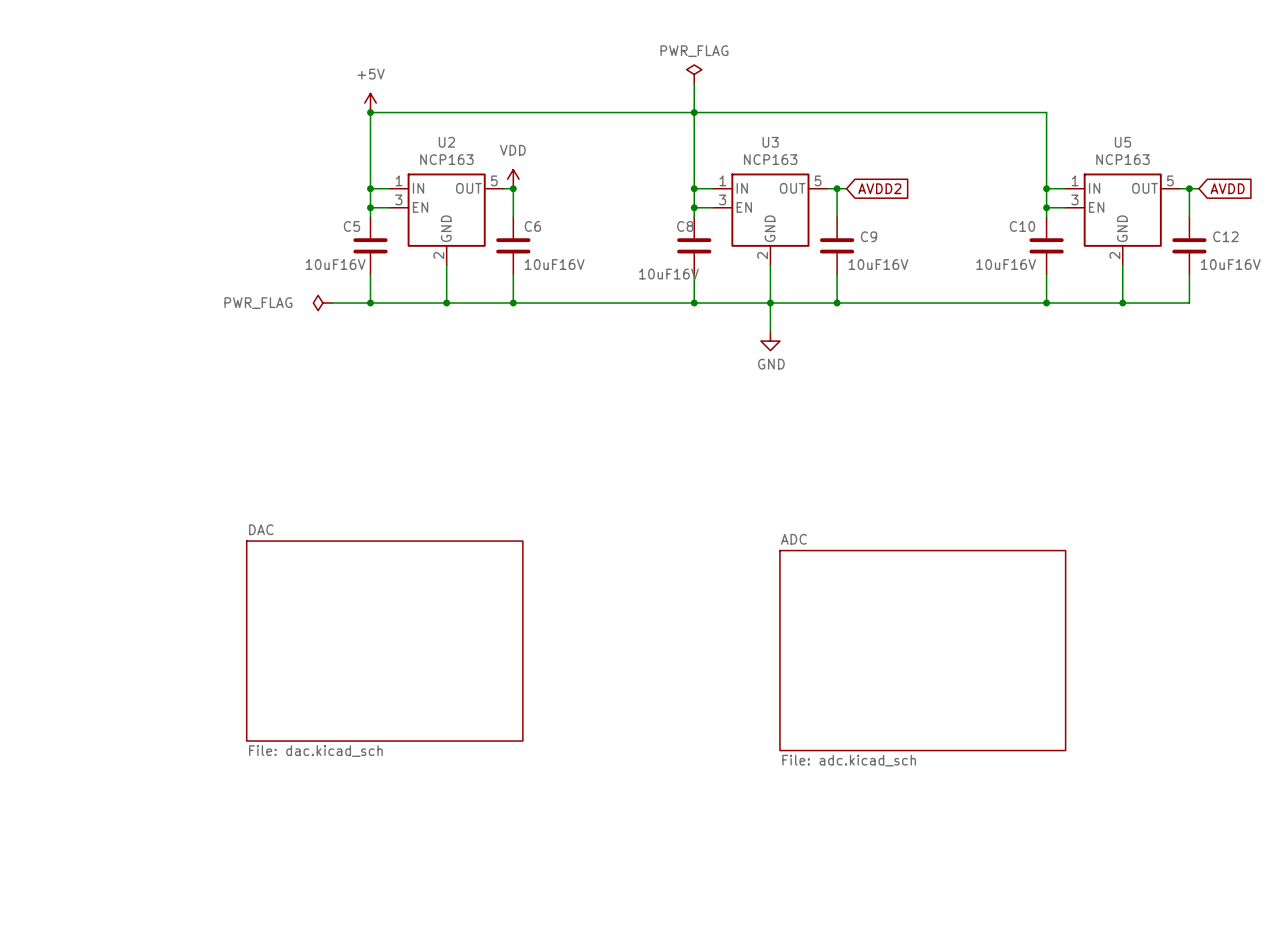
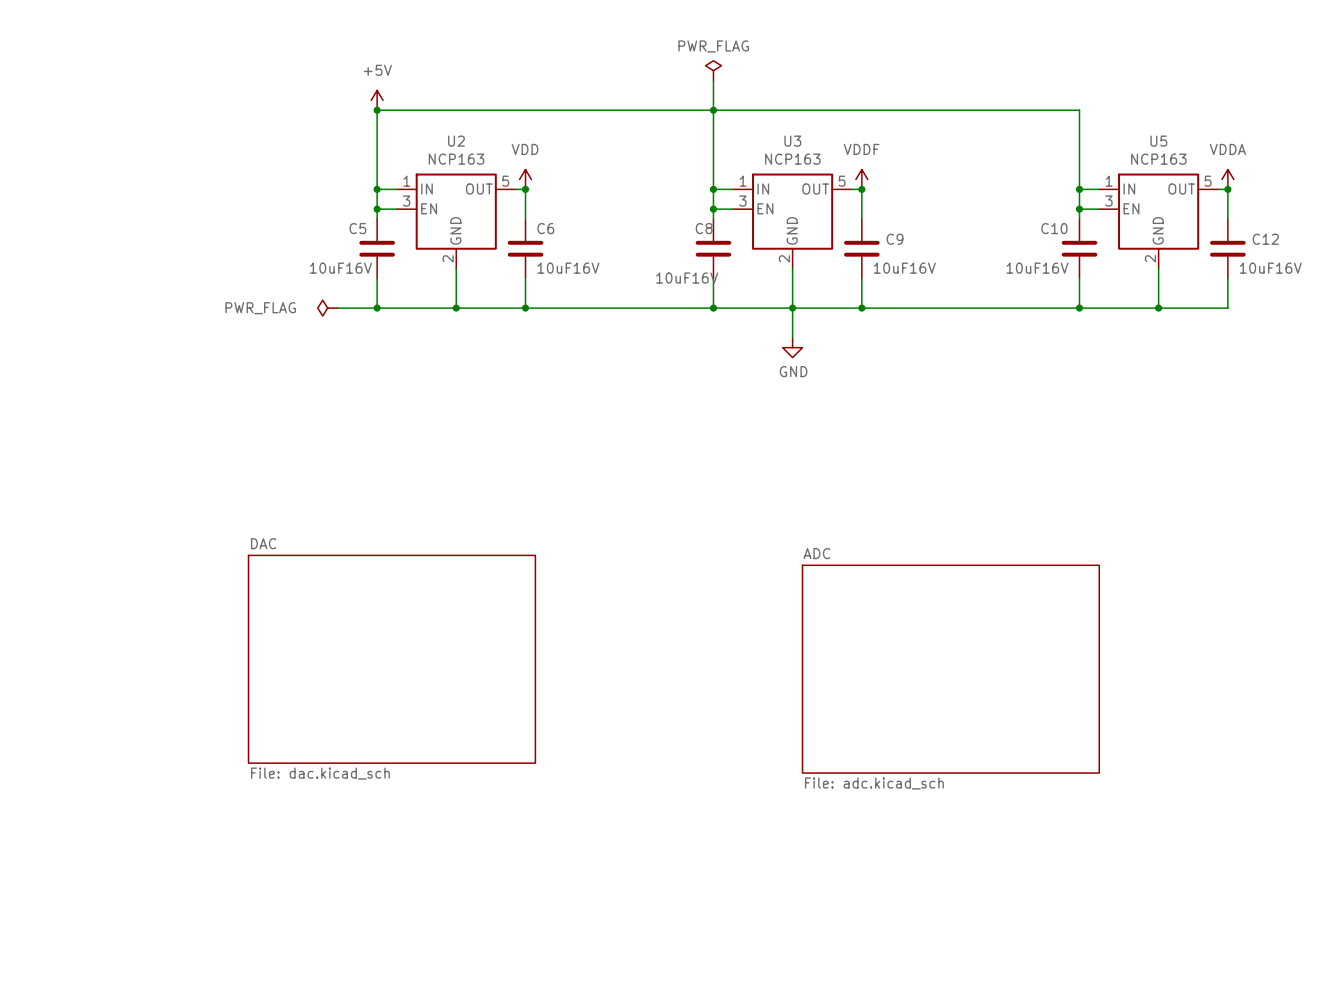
power symbol: none -> VDDF (861, 179)
power symbol: none -> VDDA (1227, 179)
wire: (837, 188) (846, 188) -> none
global label: AVDD2 (879, 188) -> none
wire: (1189, 188) (1198, 188) -> none
global label: AVDD (1227, 188) -> none

